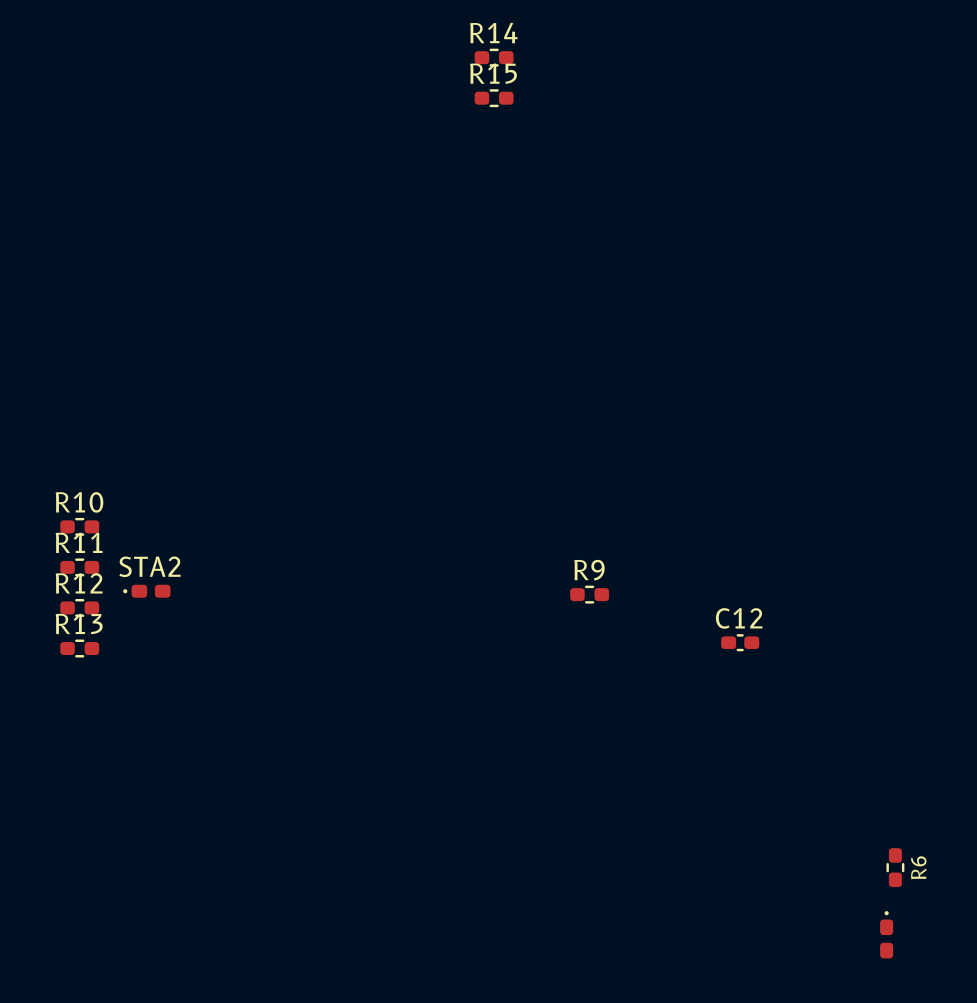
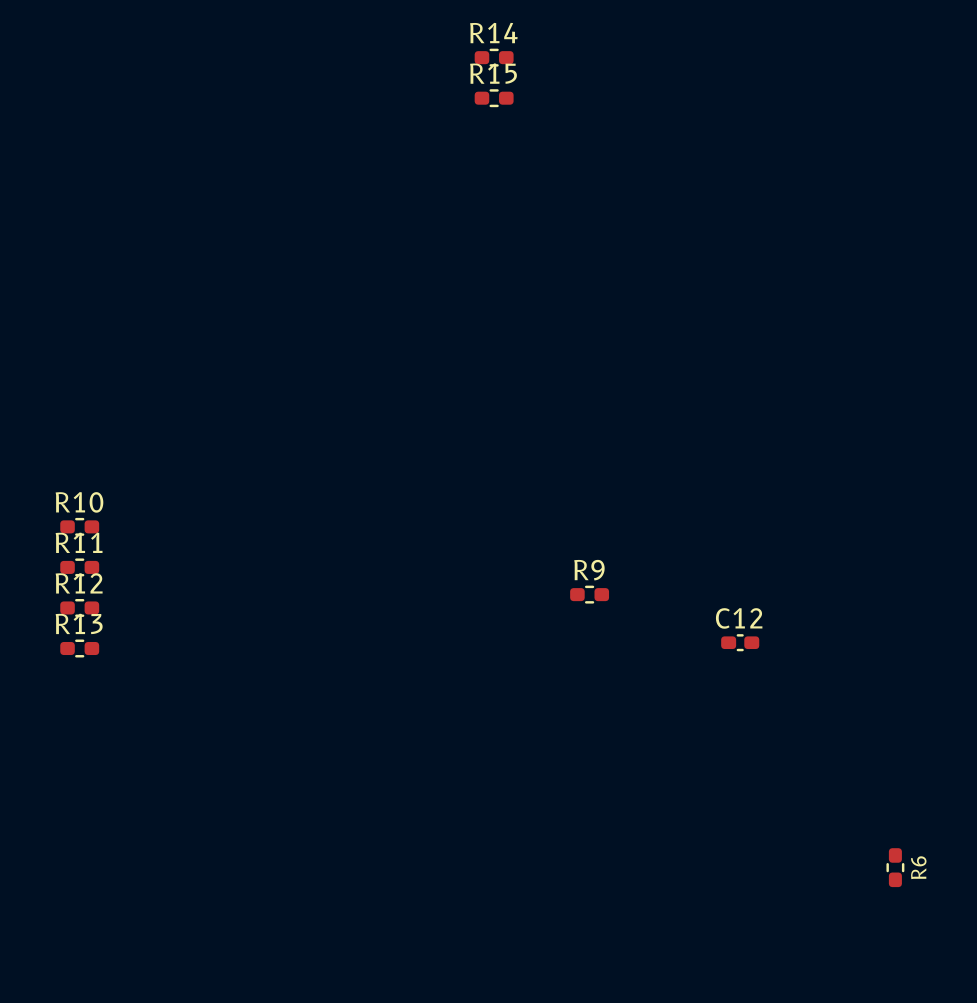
STA2: (146, 591) -> none
part: (886, 934) -> none

